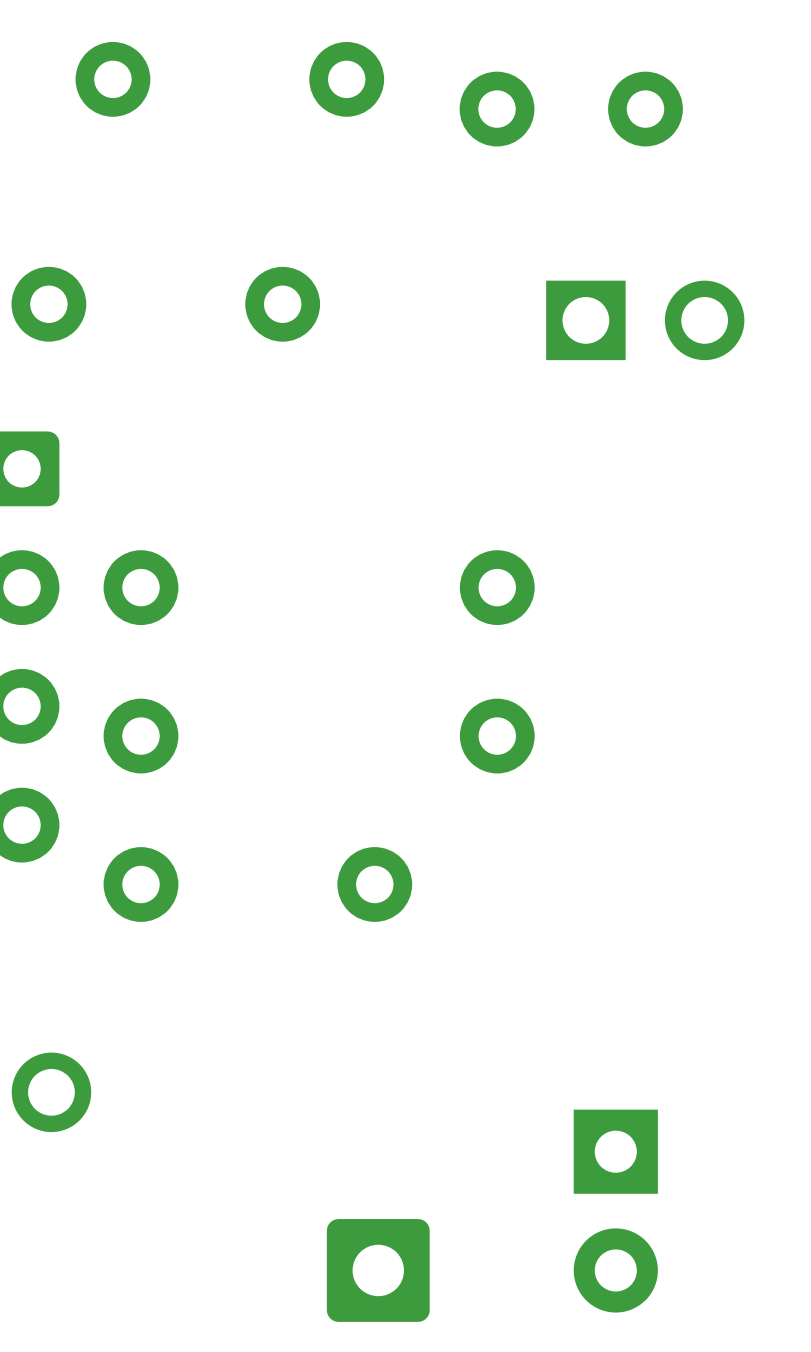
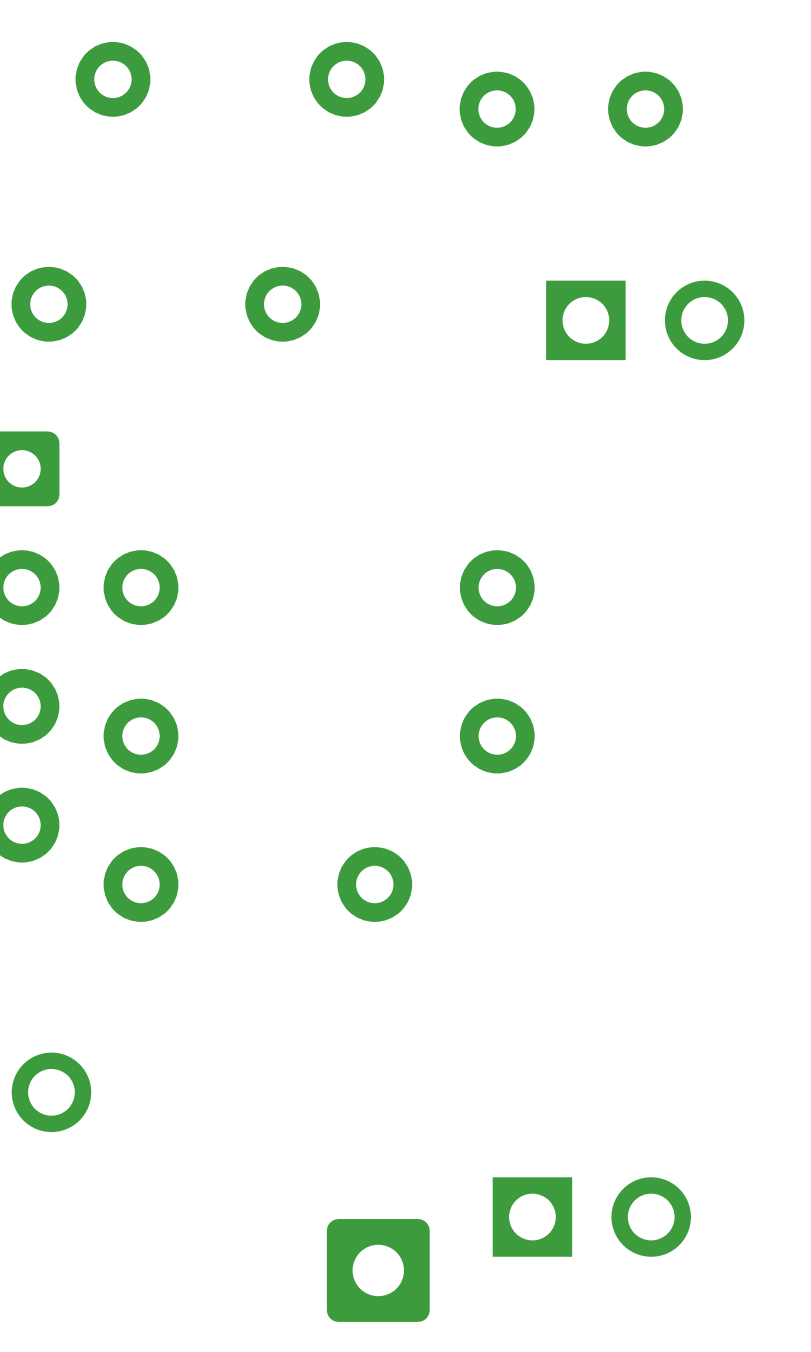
part footprint: [573, 1109, 658, 1313] -> [492, 1177, 691, 1257]

